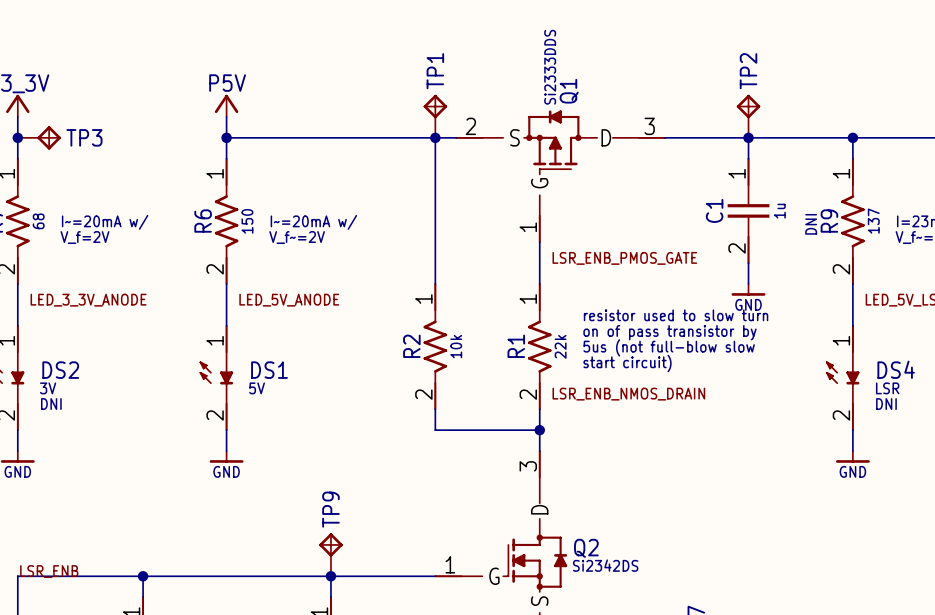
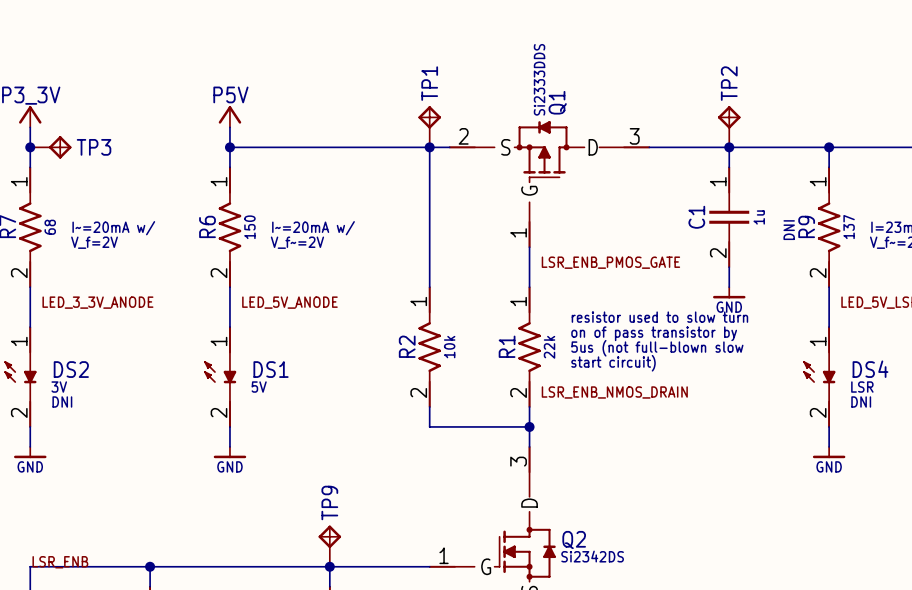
text: 5us (not full-blow slow (669, 347) -> 5us (not full-blown slow (657, 348)

